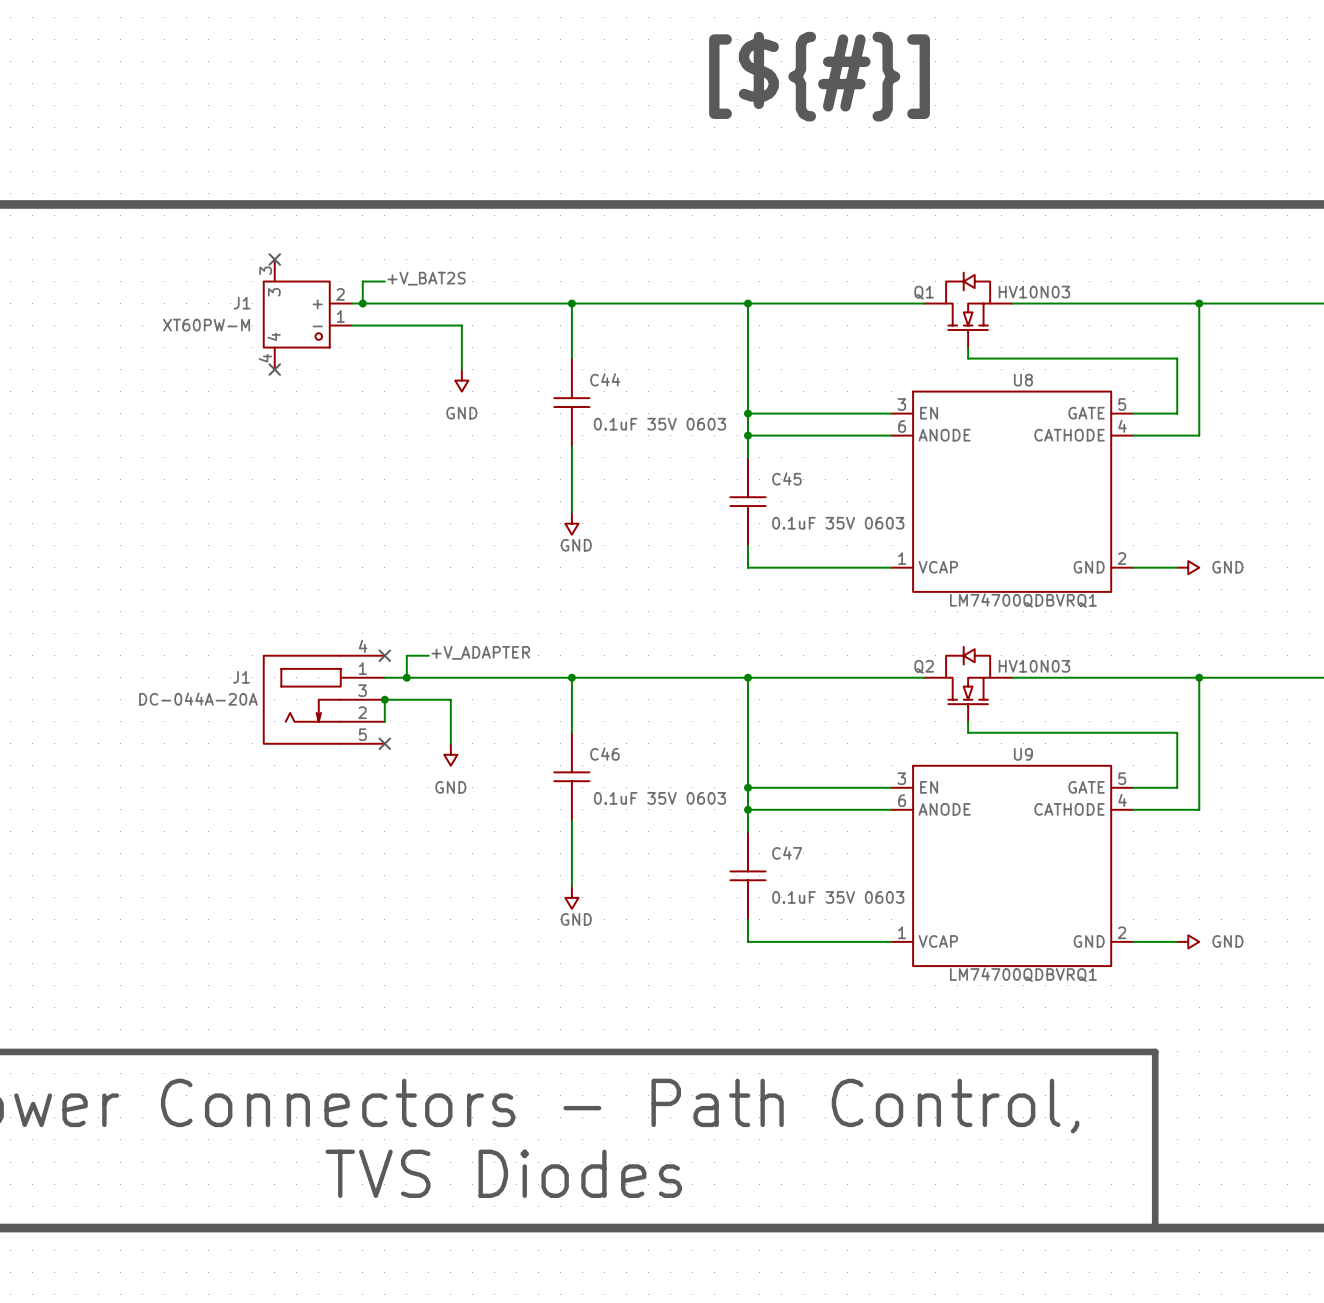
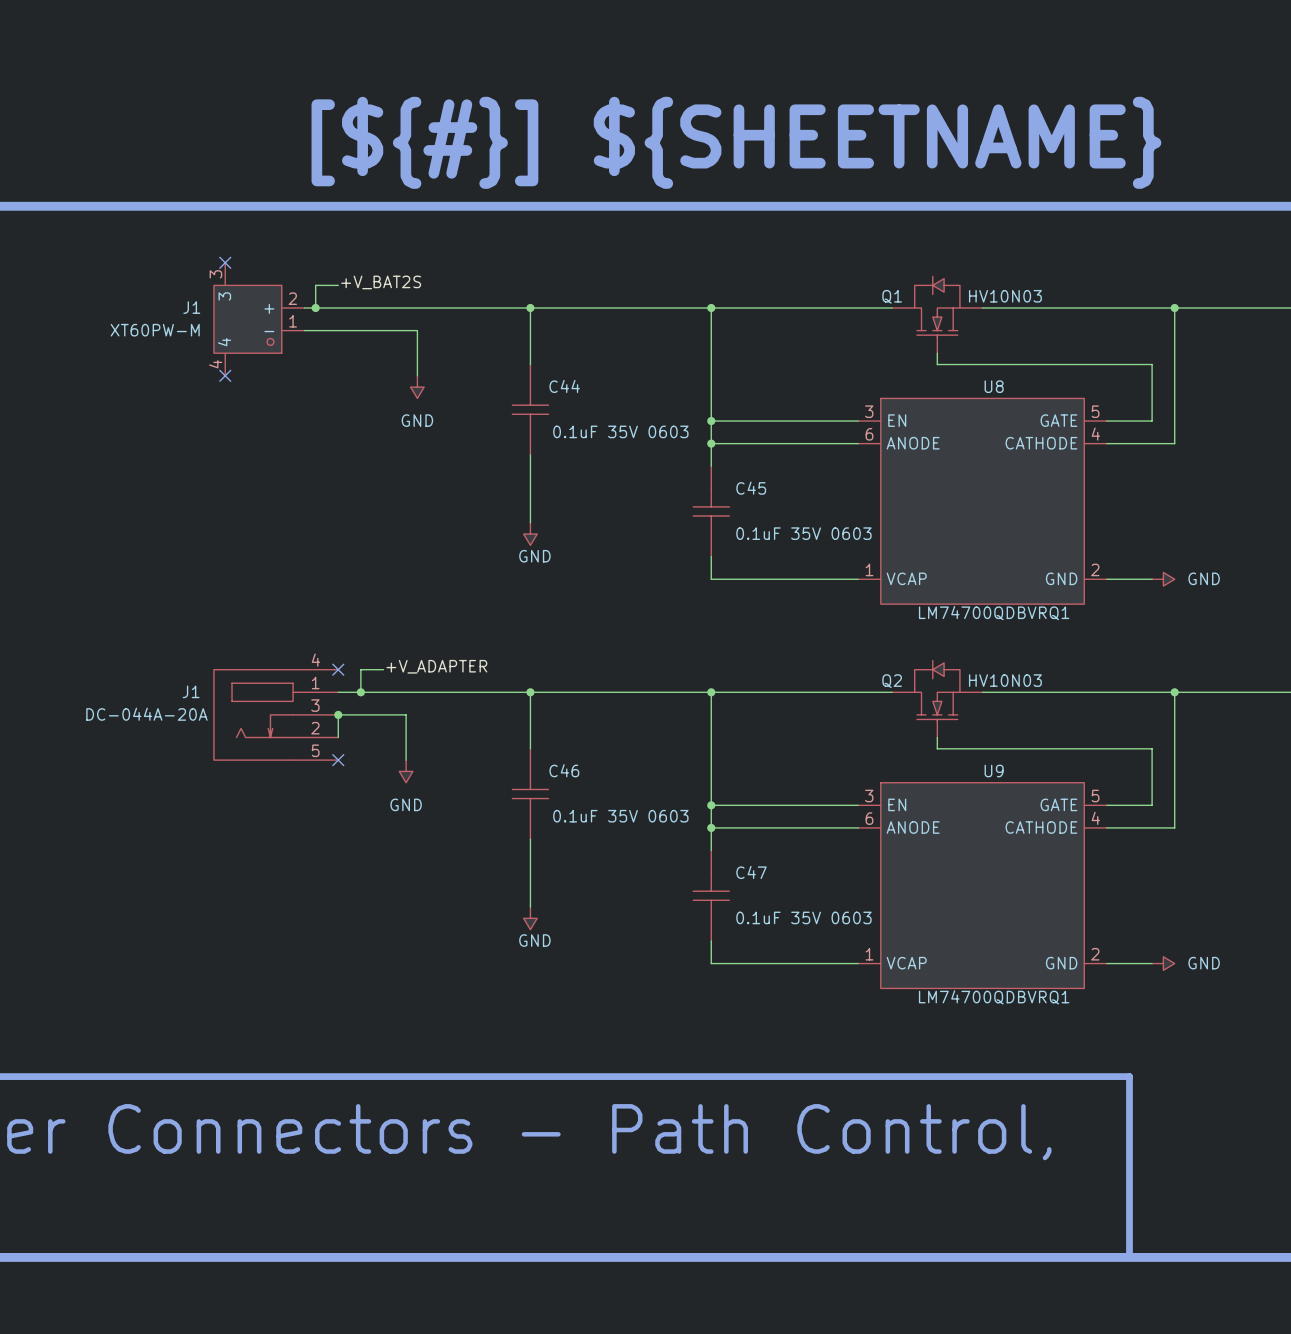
text: [${#}] (819, 76) -> none
text: none -> [${#}] ${SHEETNAME} (736, 142)
text: TVS Diodes (503, 1173) -> none

